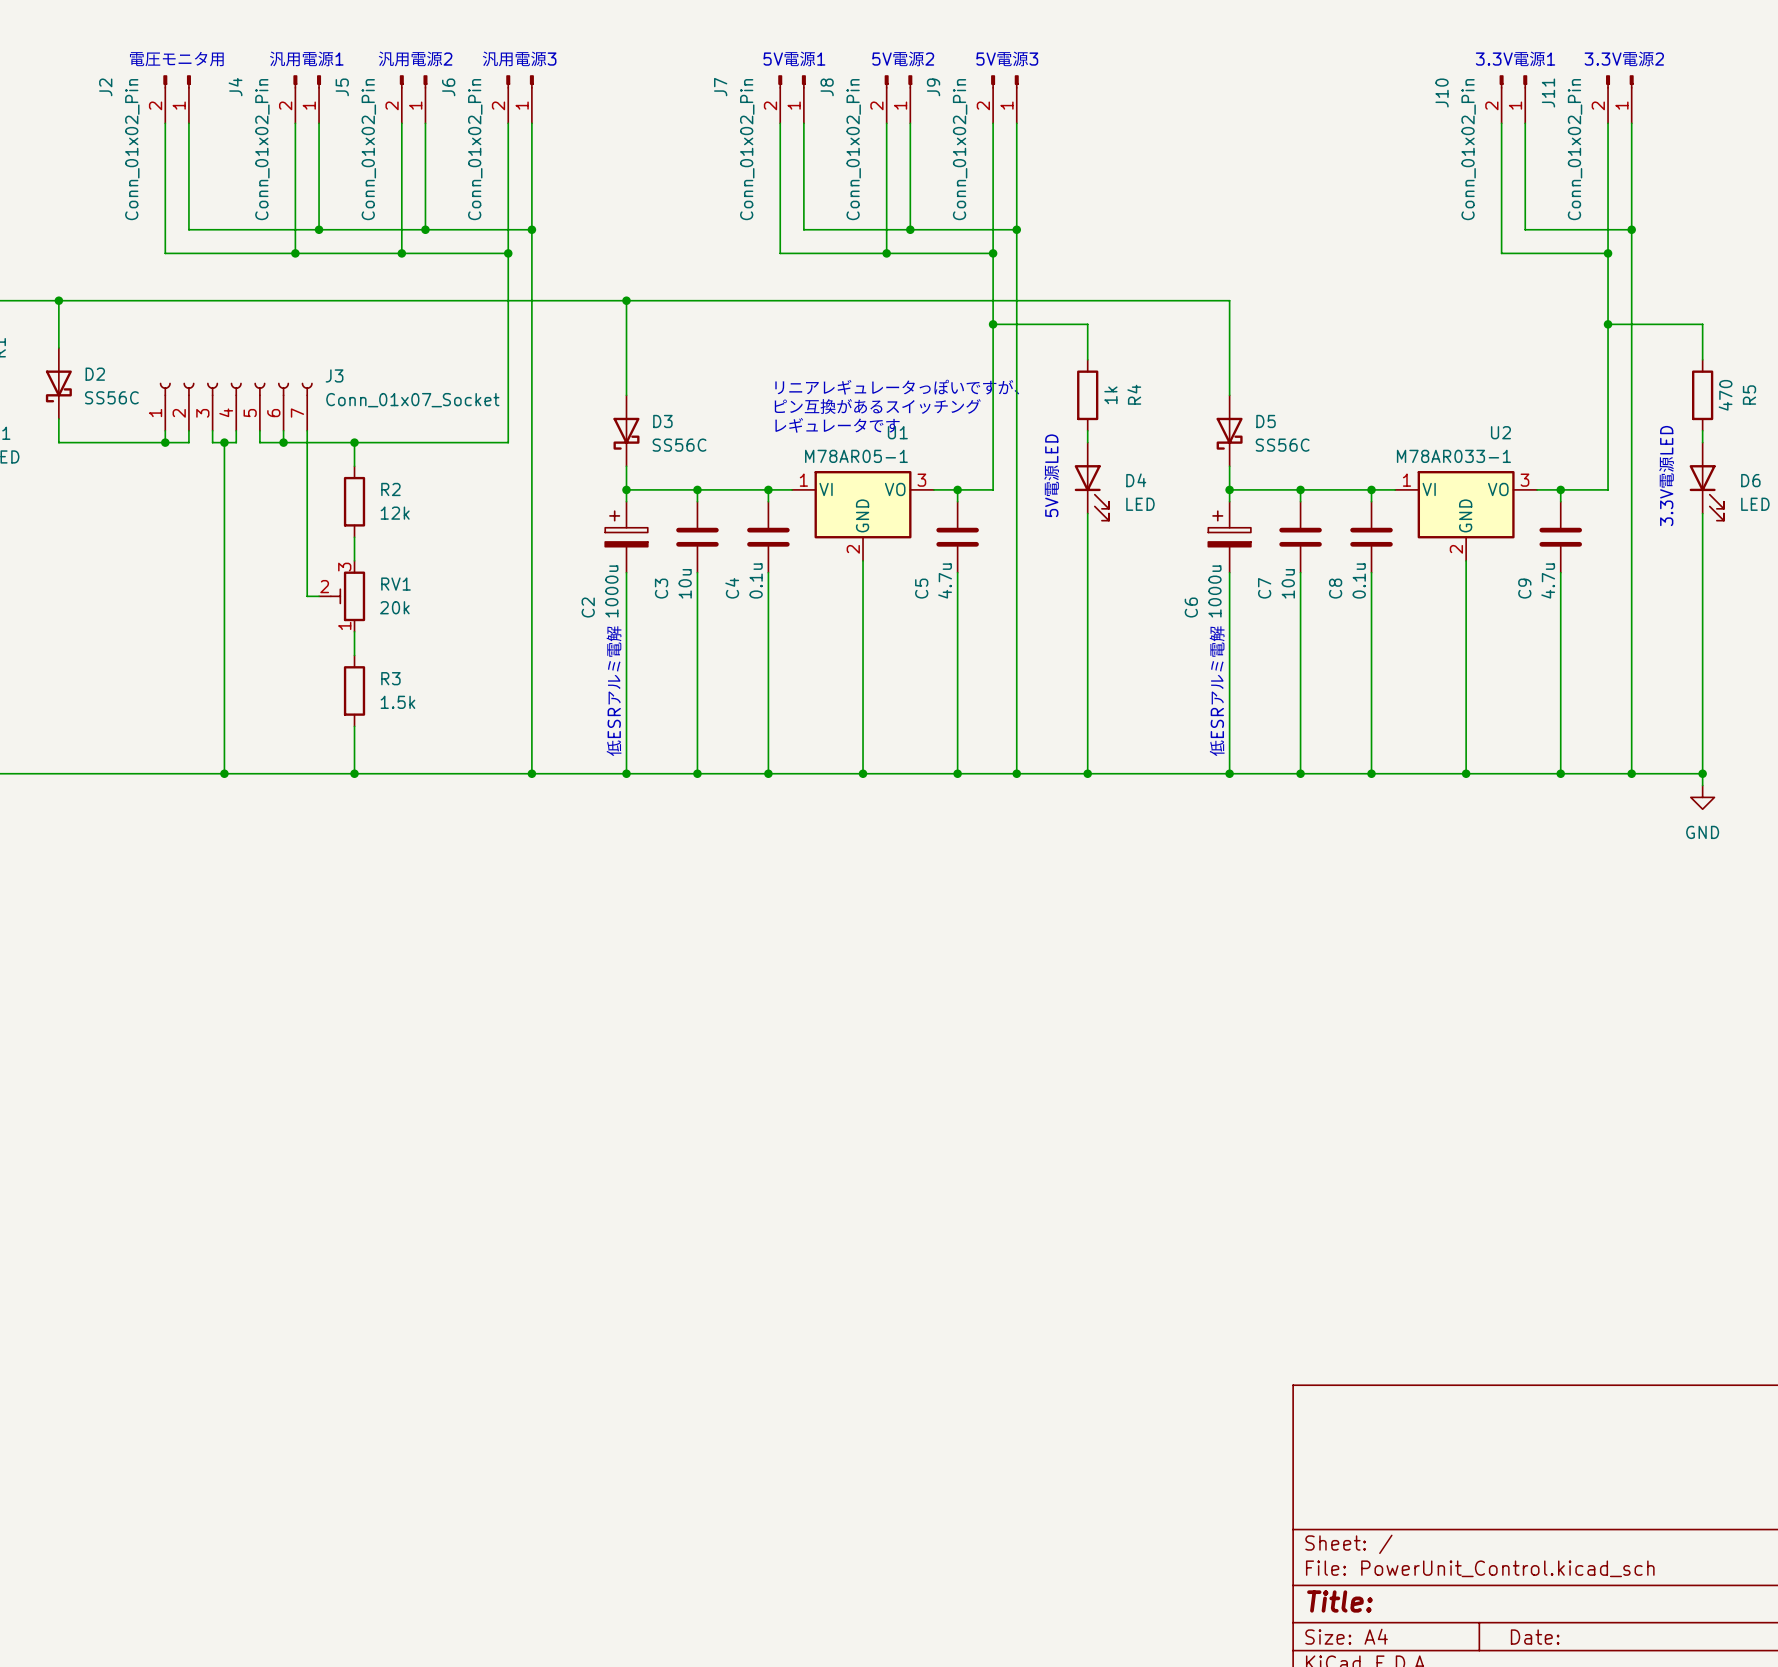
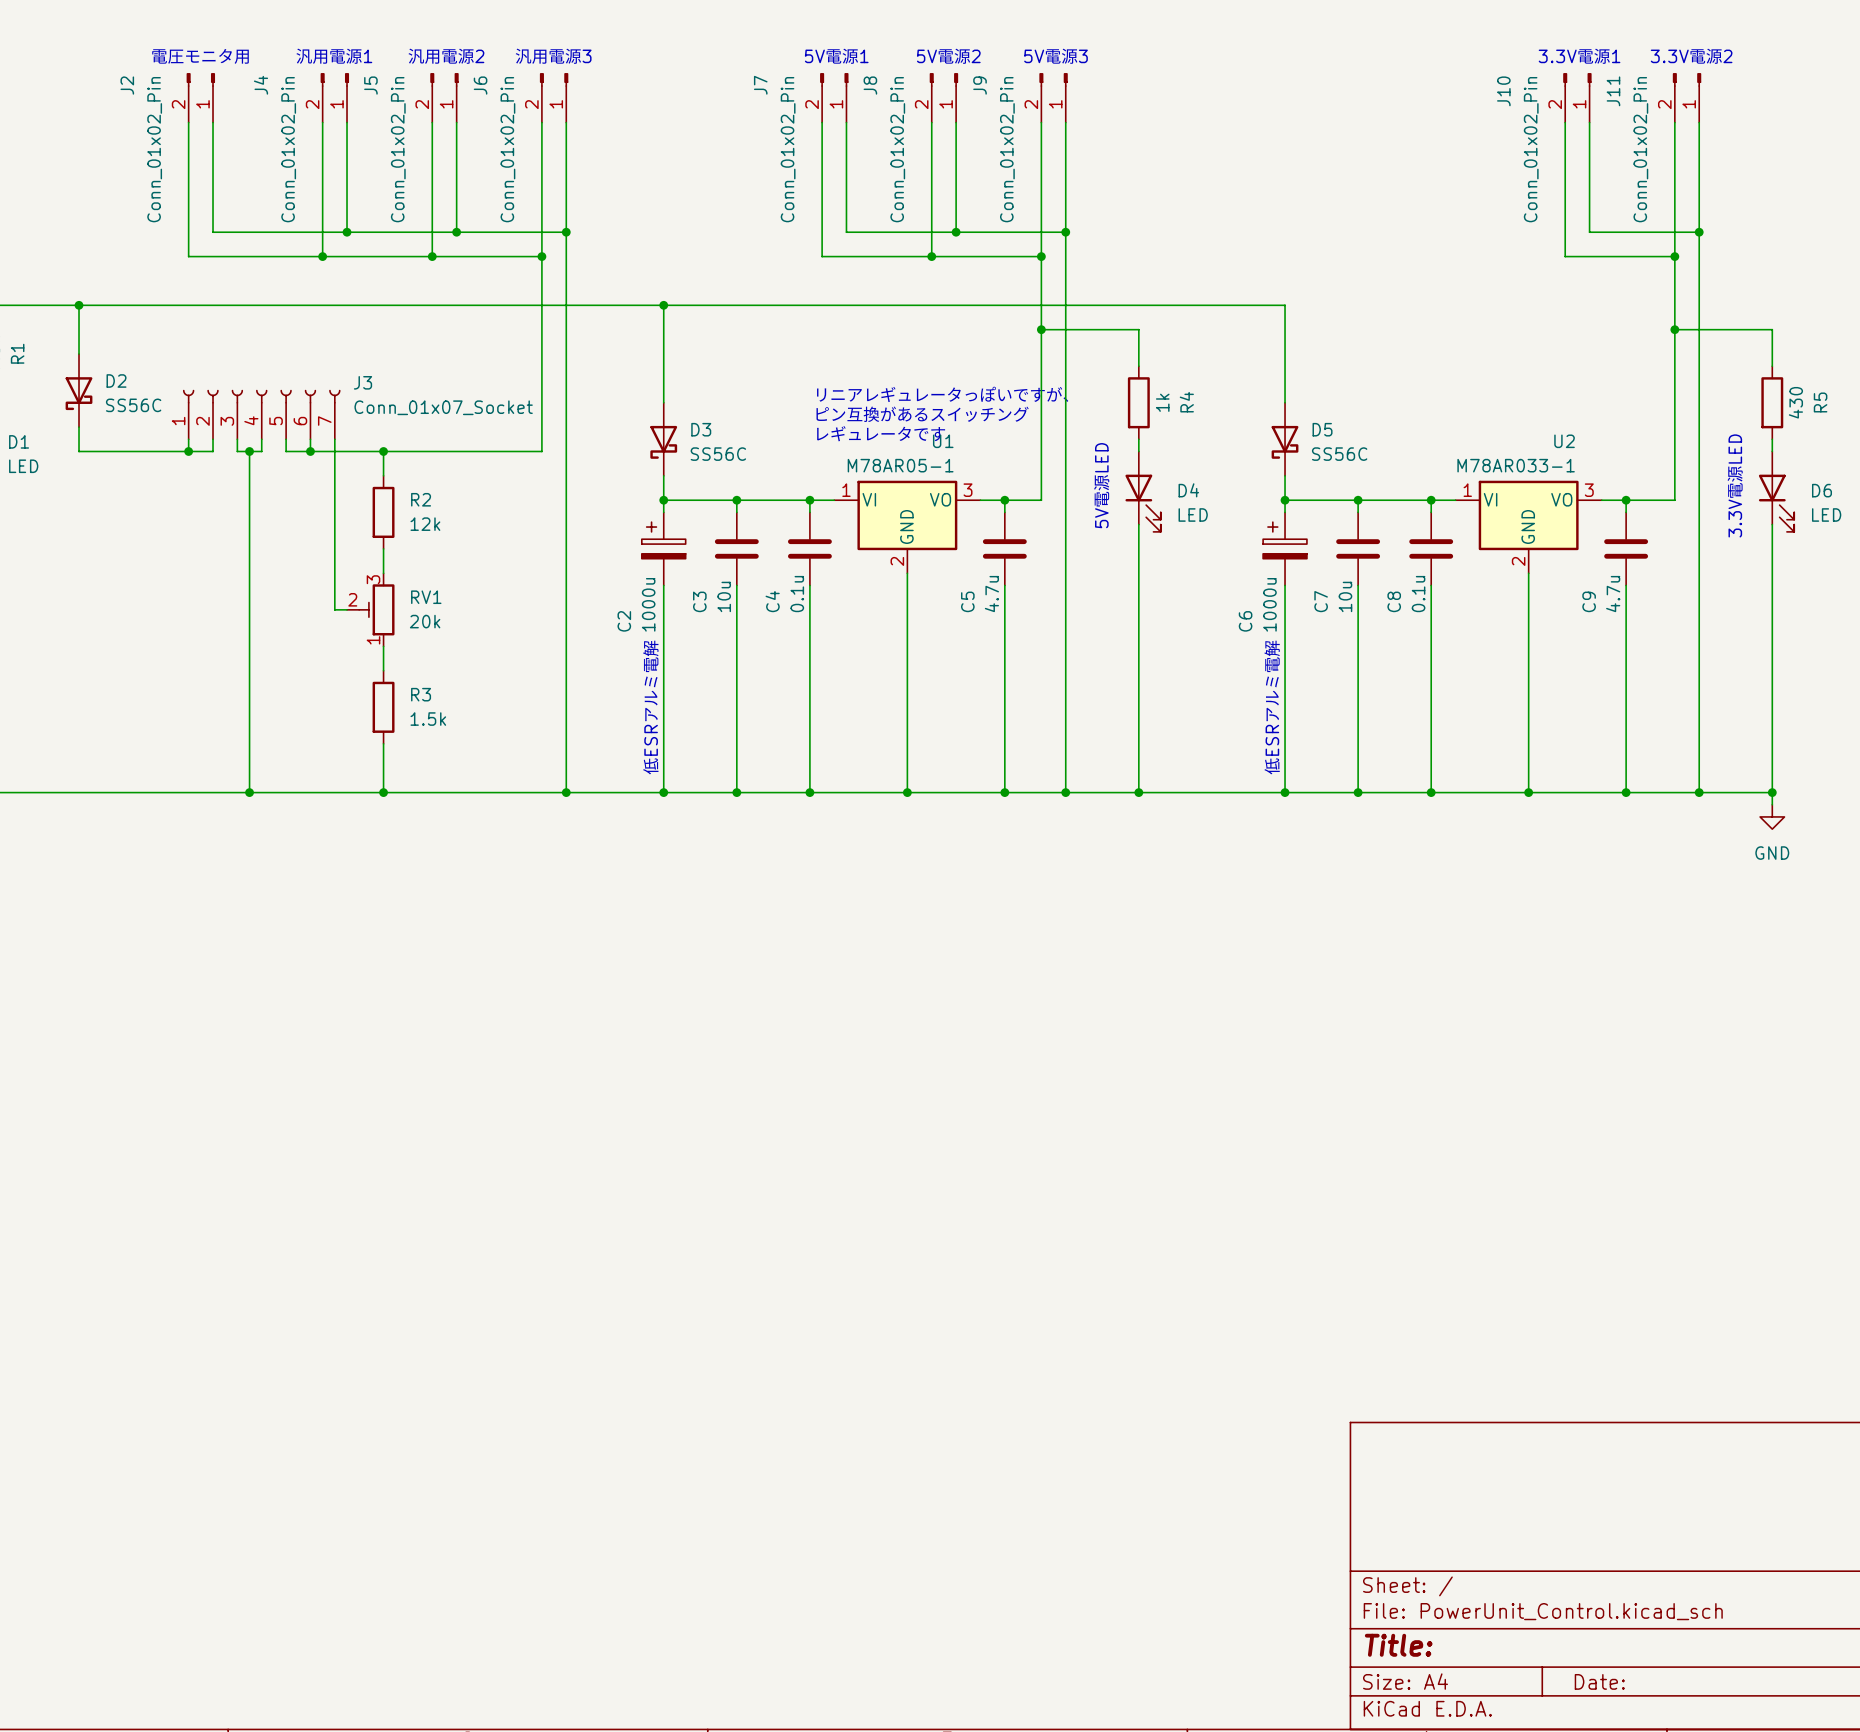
R5 value: 470 (1725, 395) -> 430 (1795, 402)

